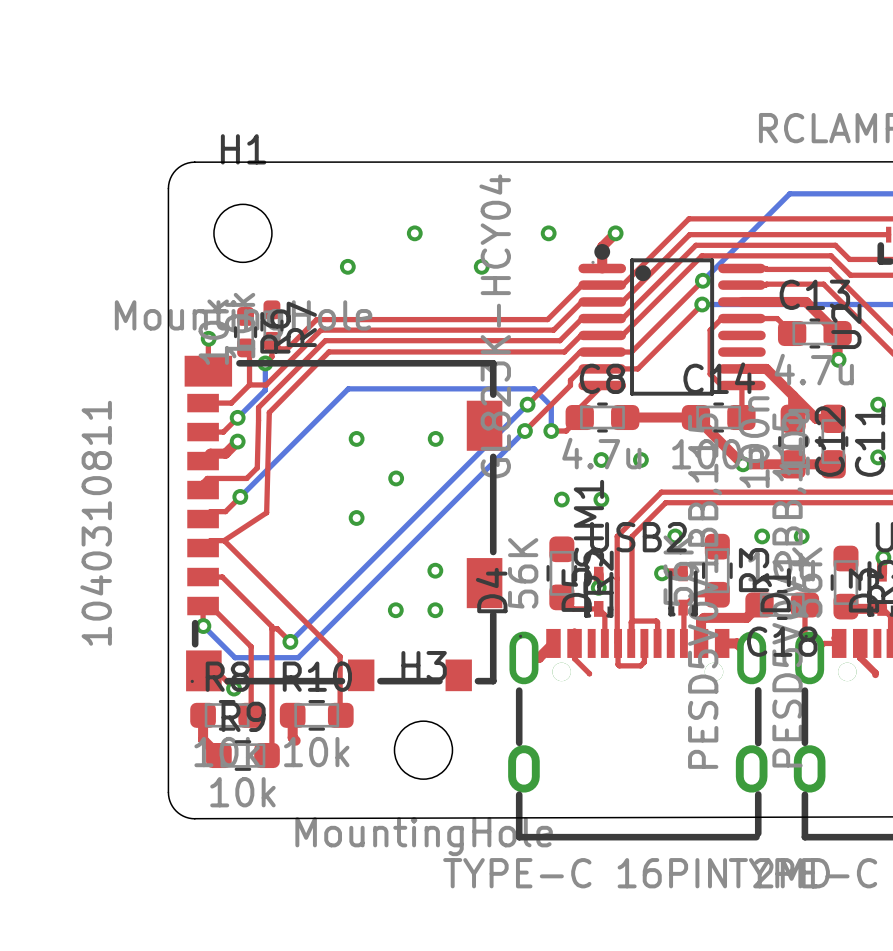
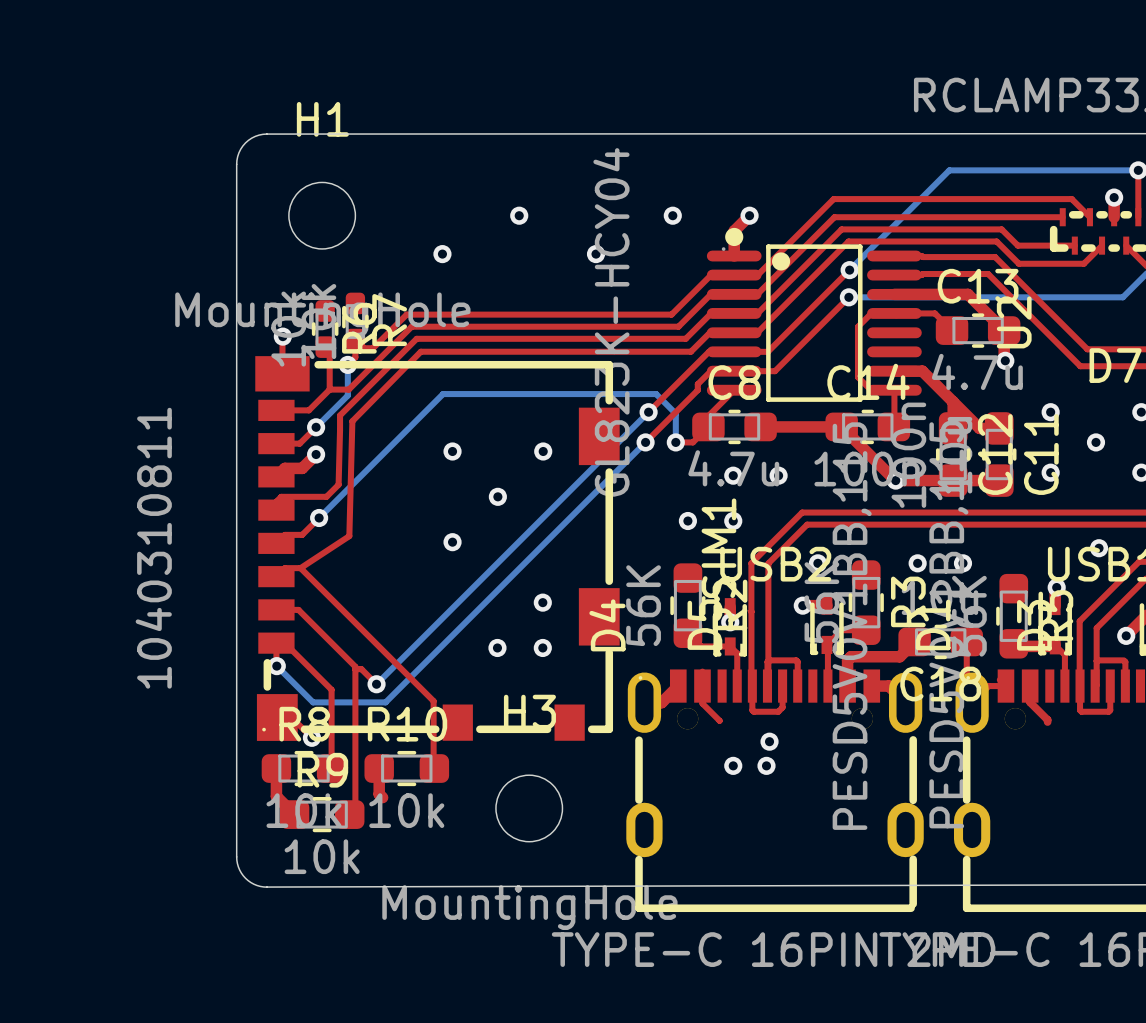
via: none -> (769, 741)
via: none -> (733, 765)
via: none -> (766, 765)

